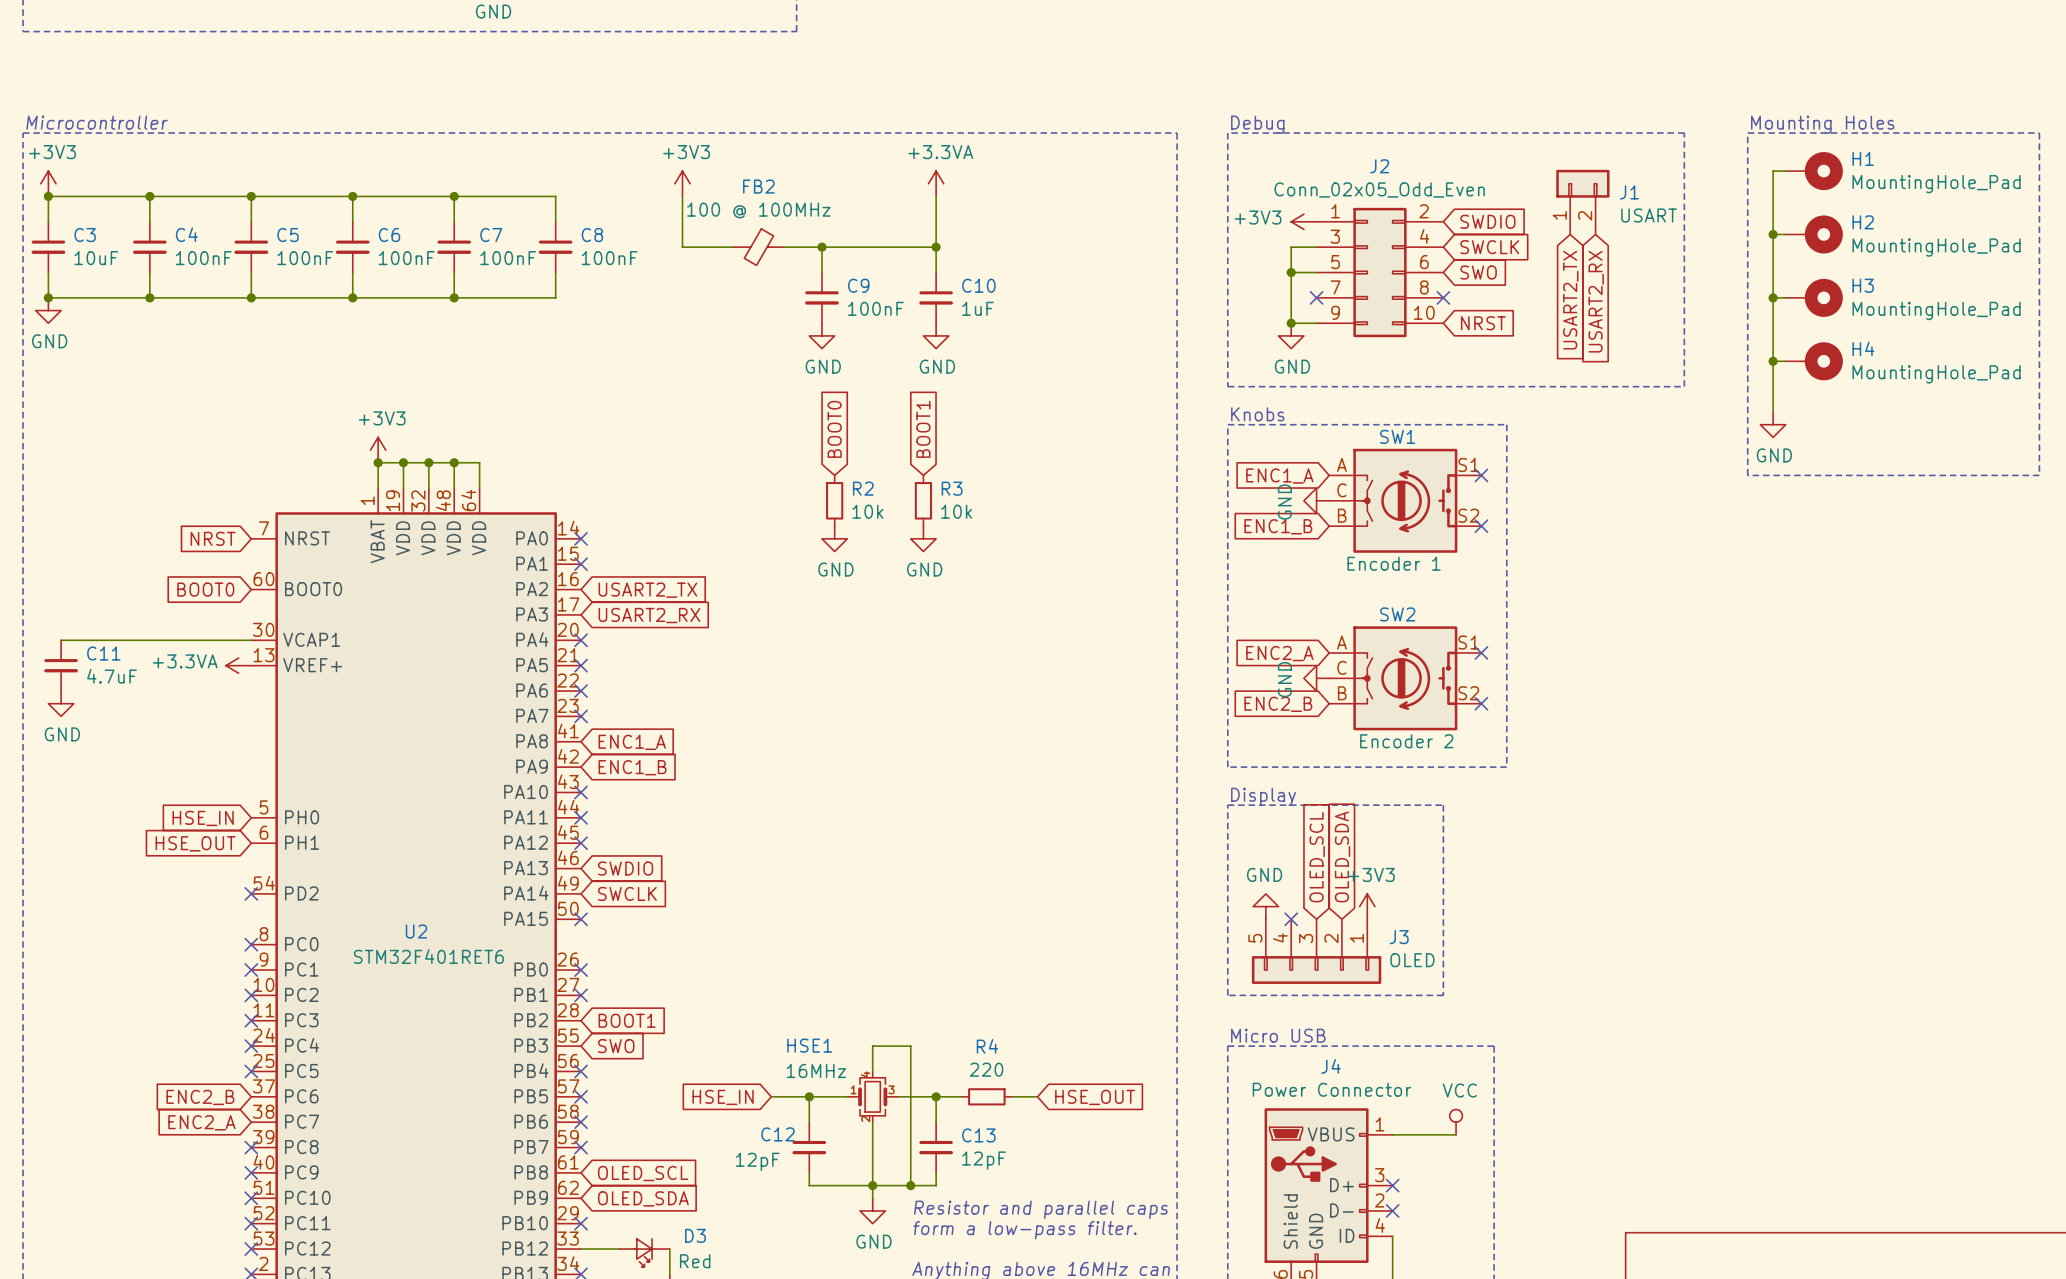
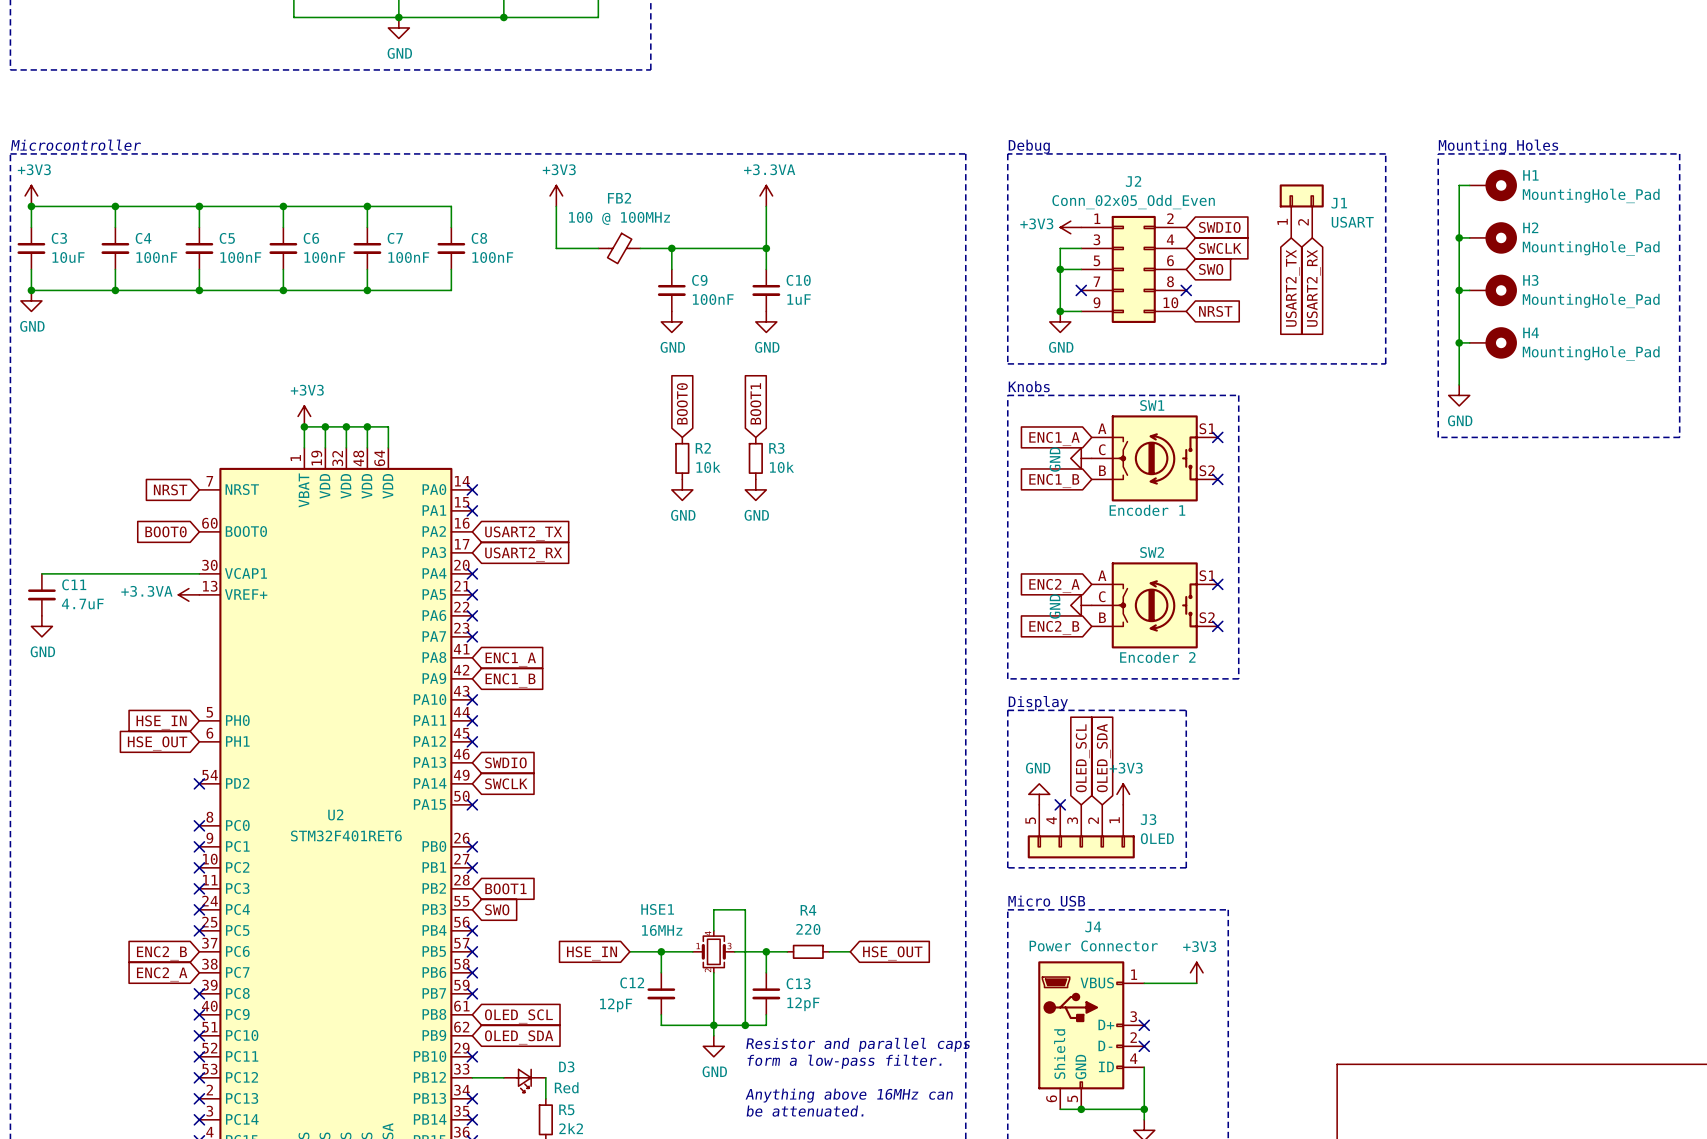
power symbol: VCC (1456, 1122) -> +3V3 (1196, 972)

